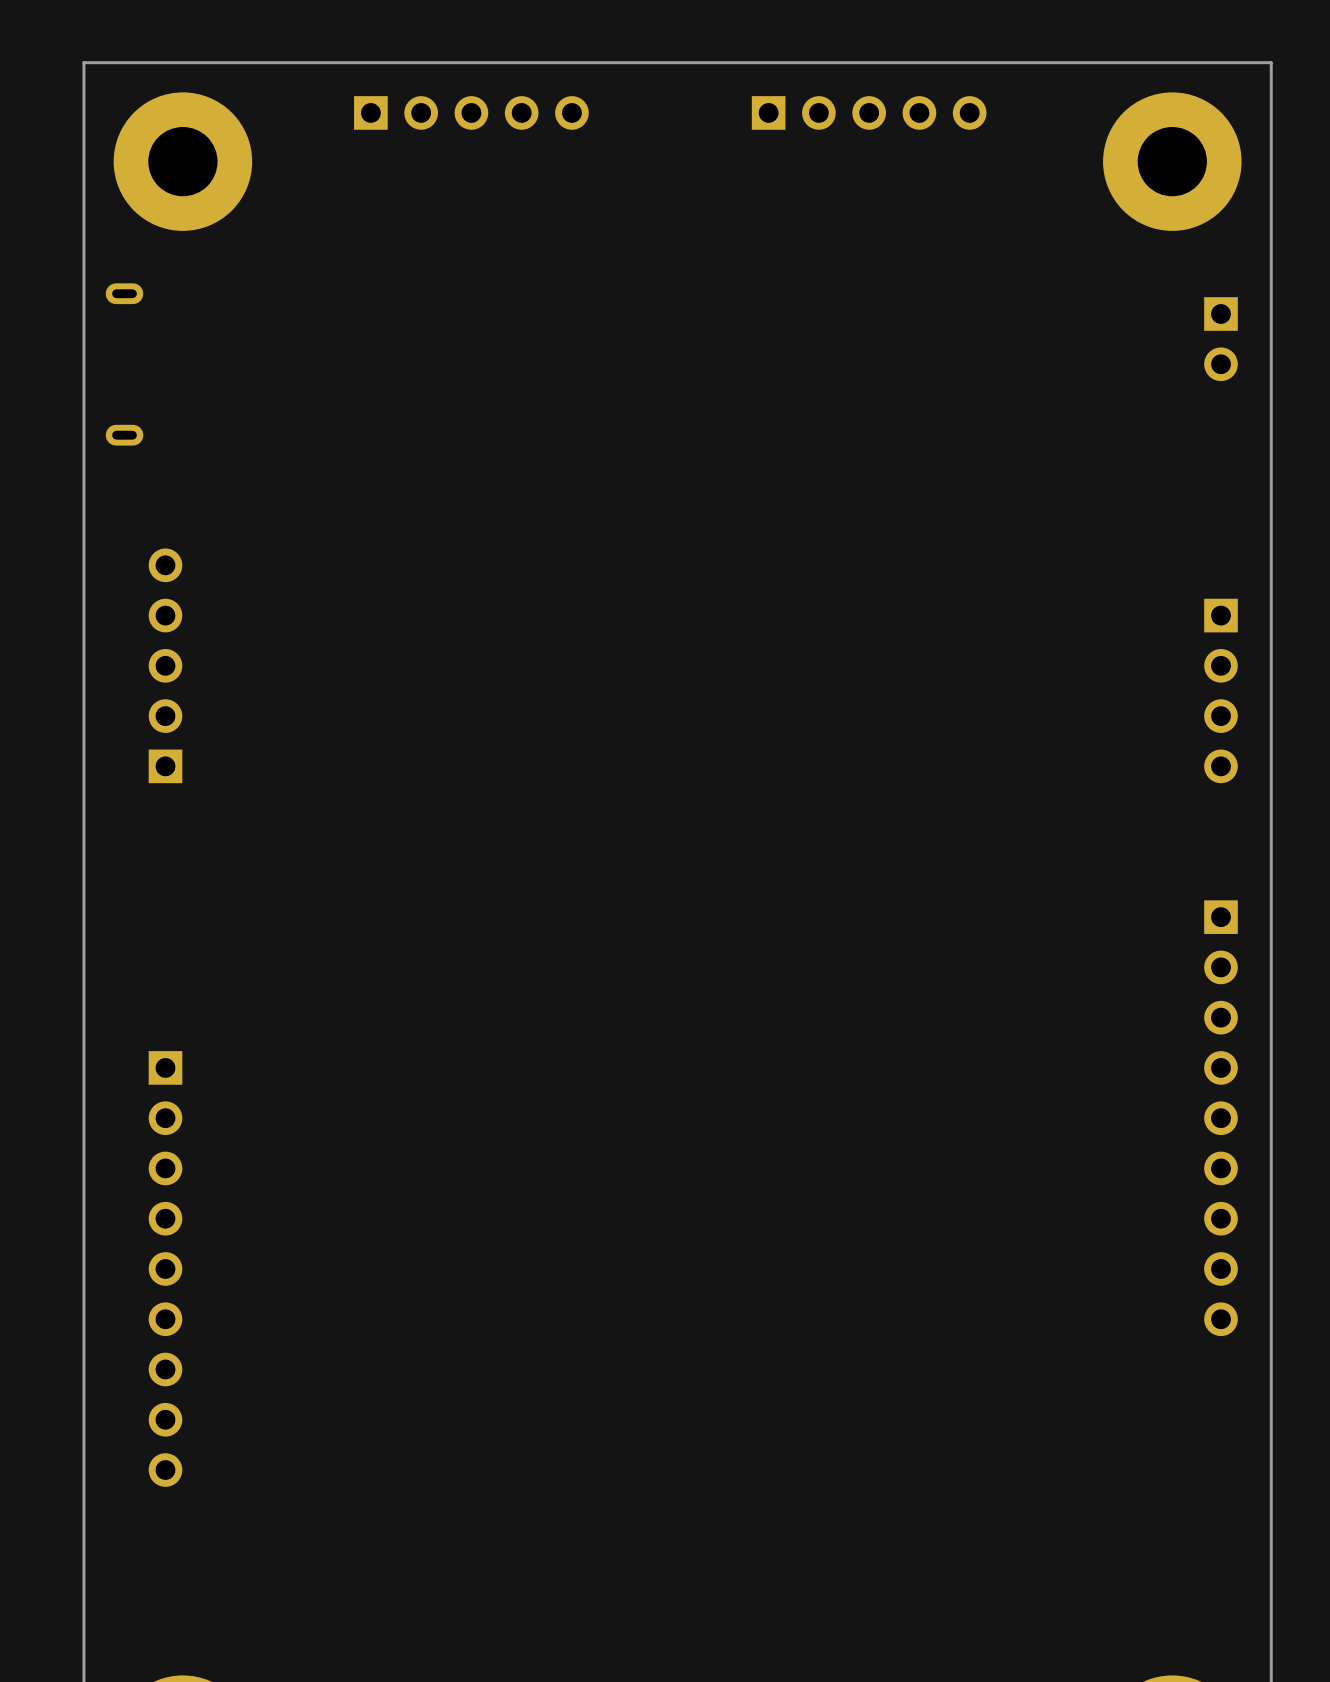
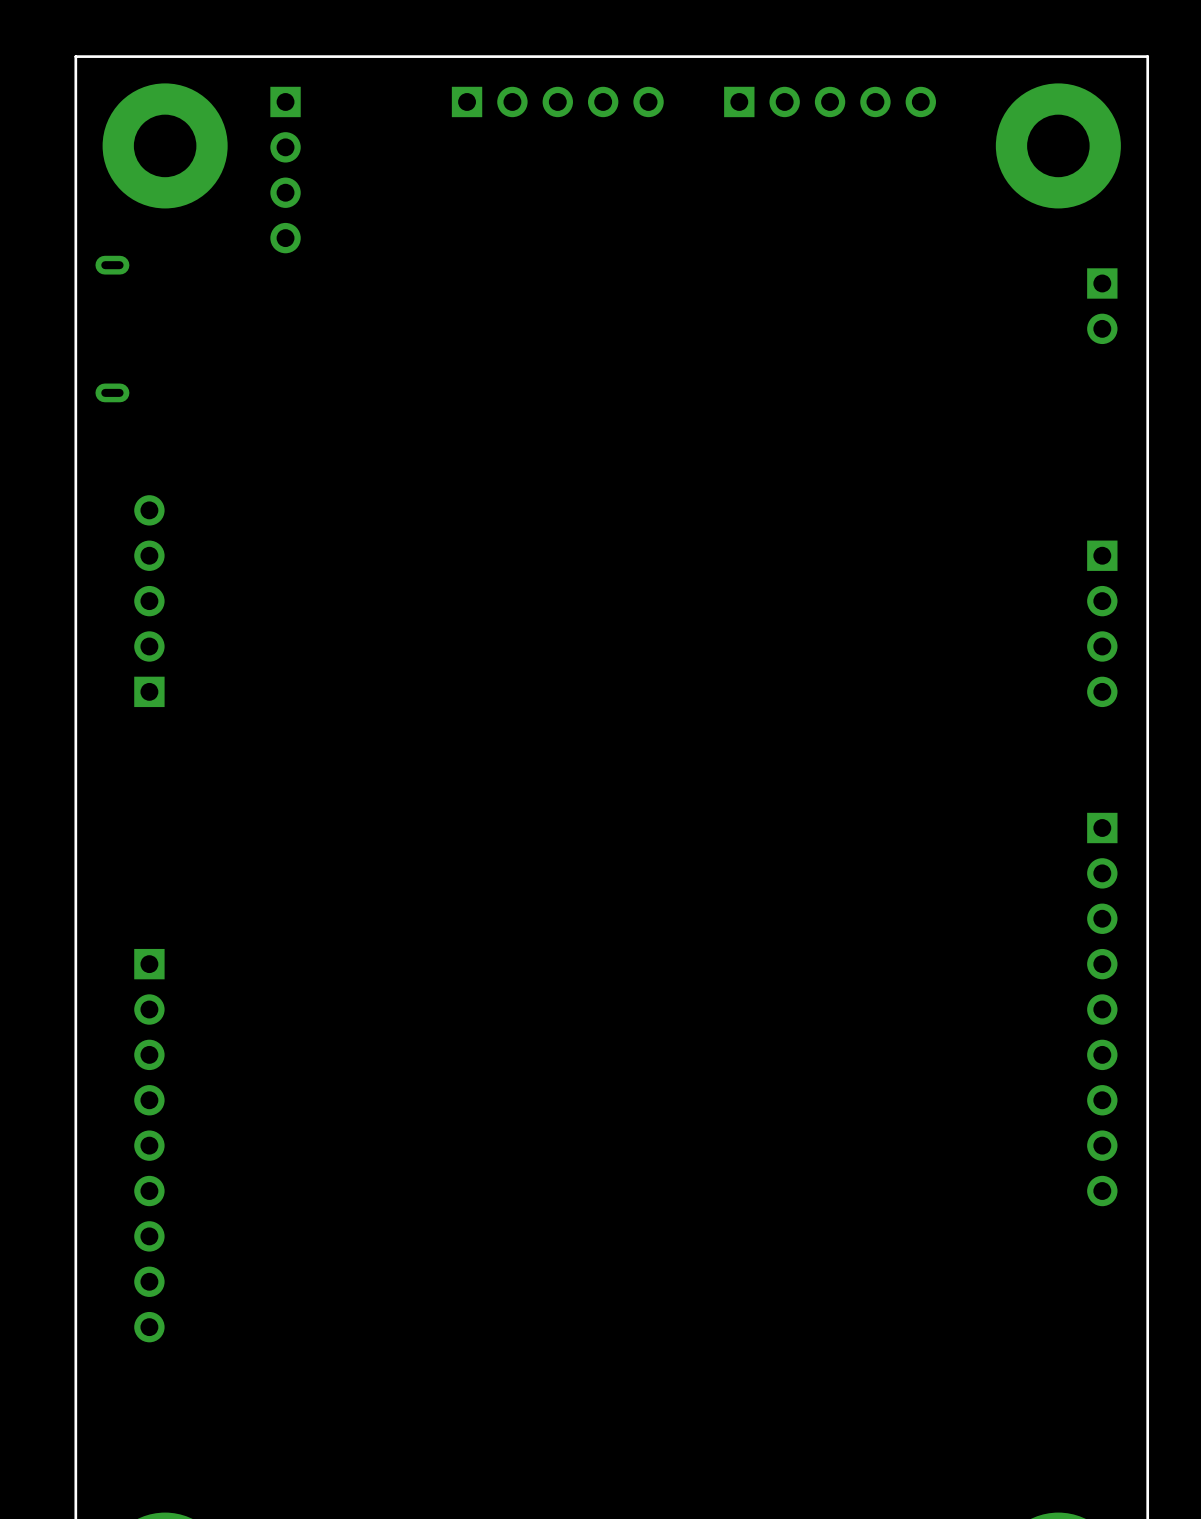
part: (471, 112) -> none
part: none -> (557, 101)
part position: (869, 112) -> (830, 101)
part: none -> (285, 170)

